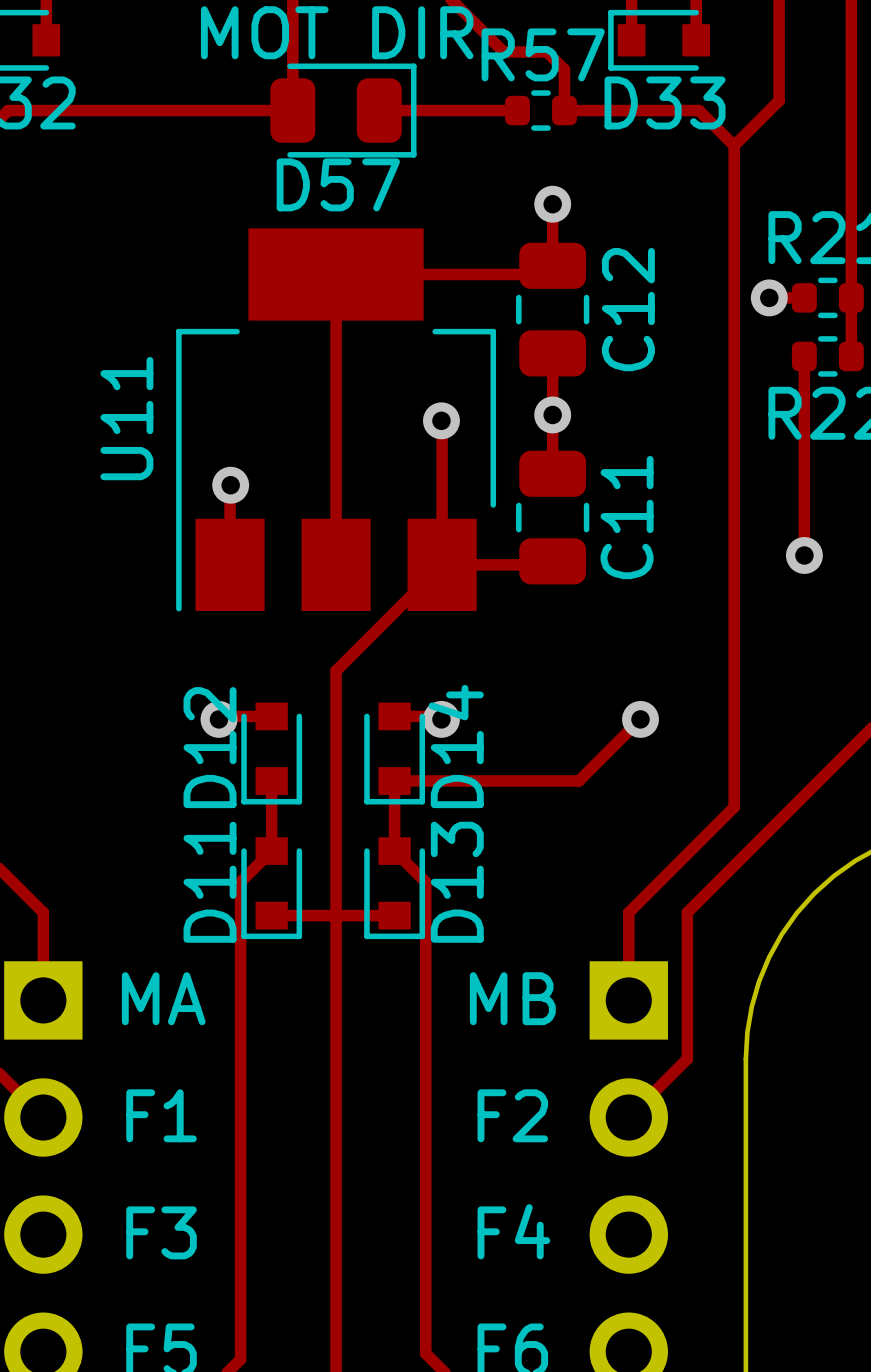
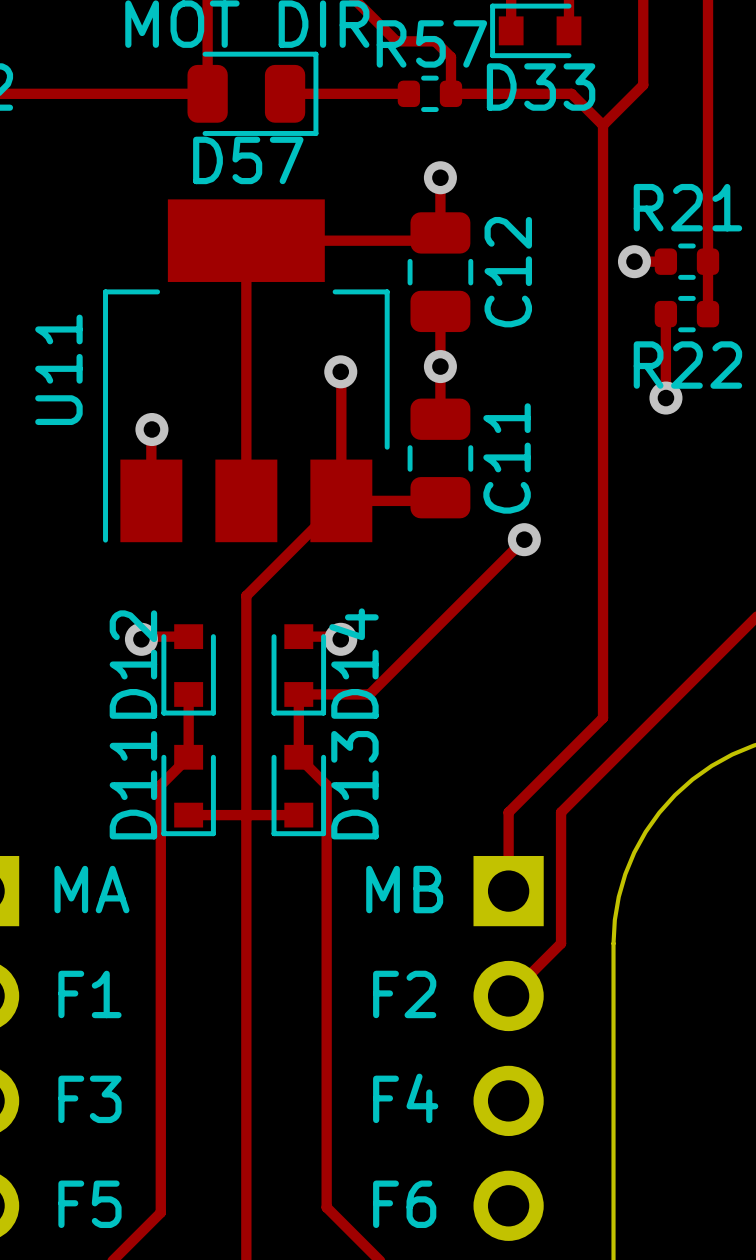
track: (804, 450) (804, 555) -> none
via: none -> (665, 398)
via: (804, 555) -> none
via: none -> (524, 539)
track: (640, 719) (578, 780) (473, 780) -> (524, 539) (369, 694)
via: (640, 719) -> none

